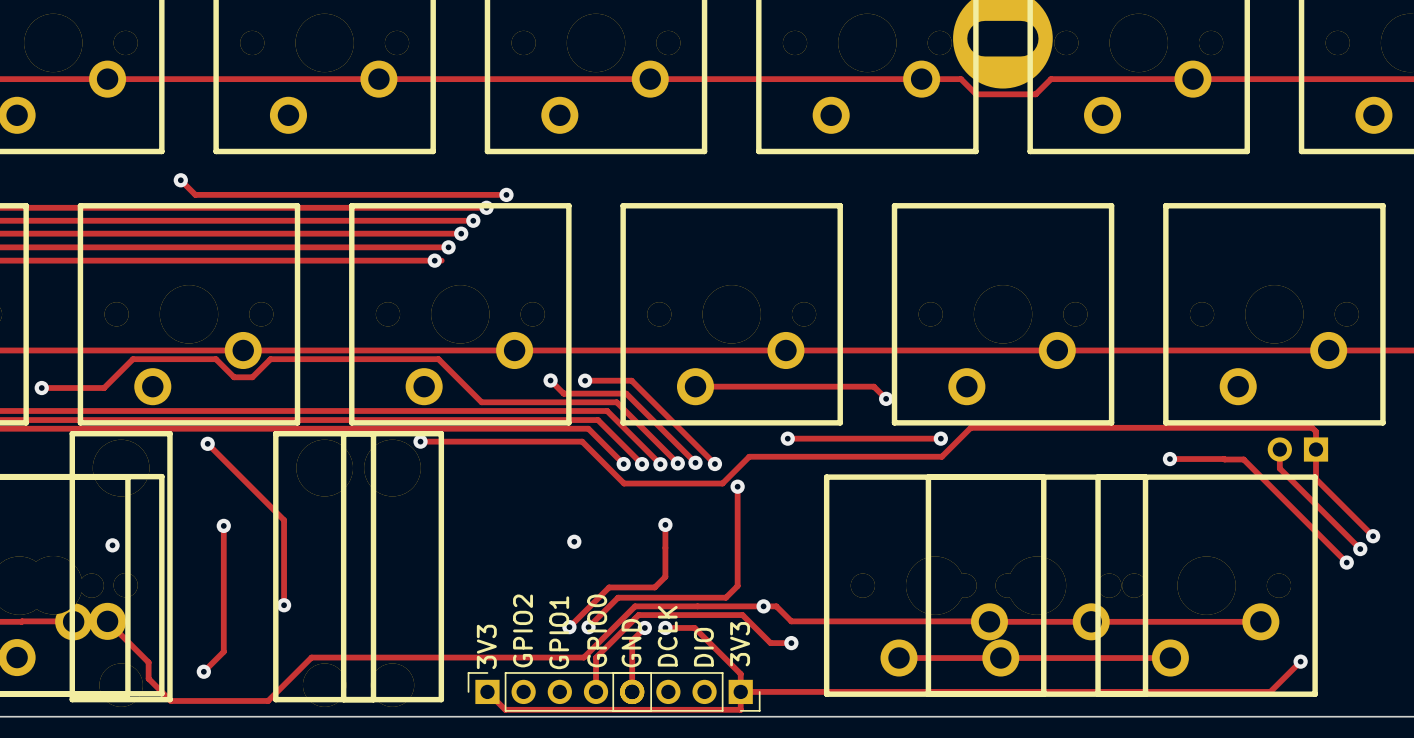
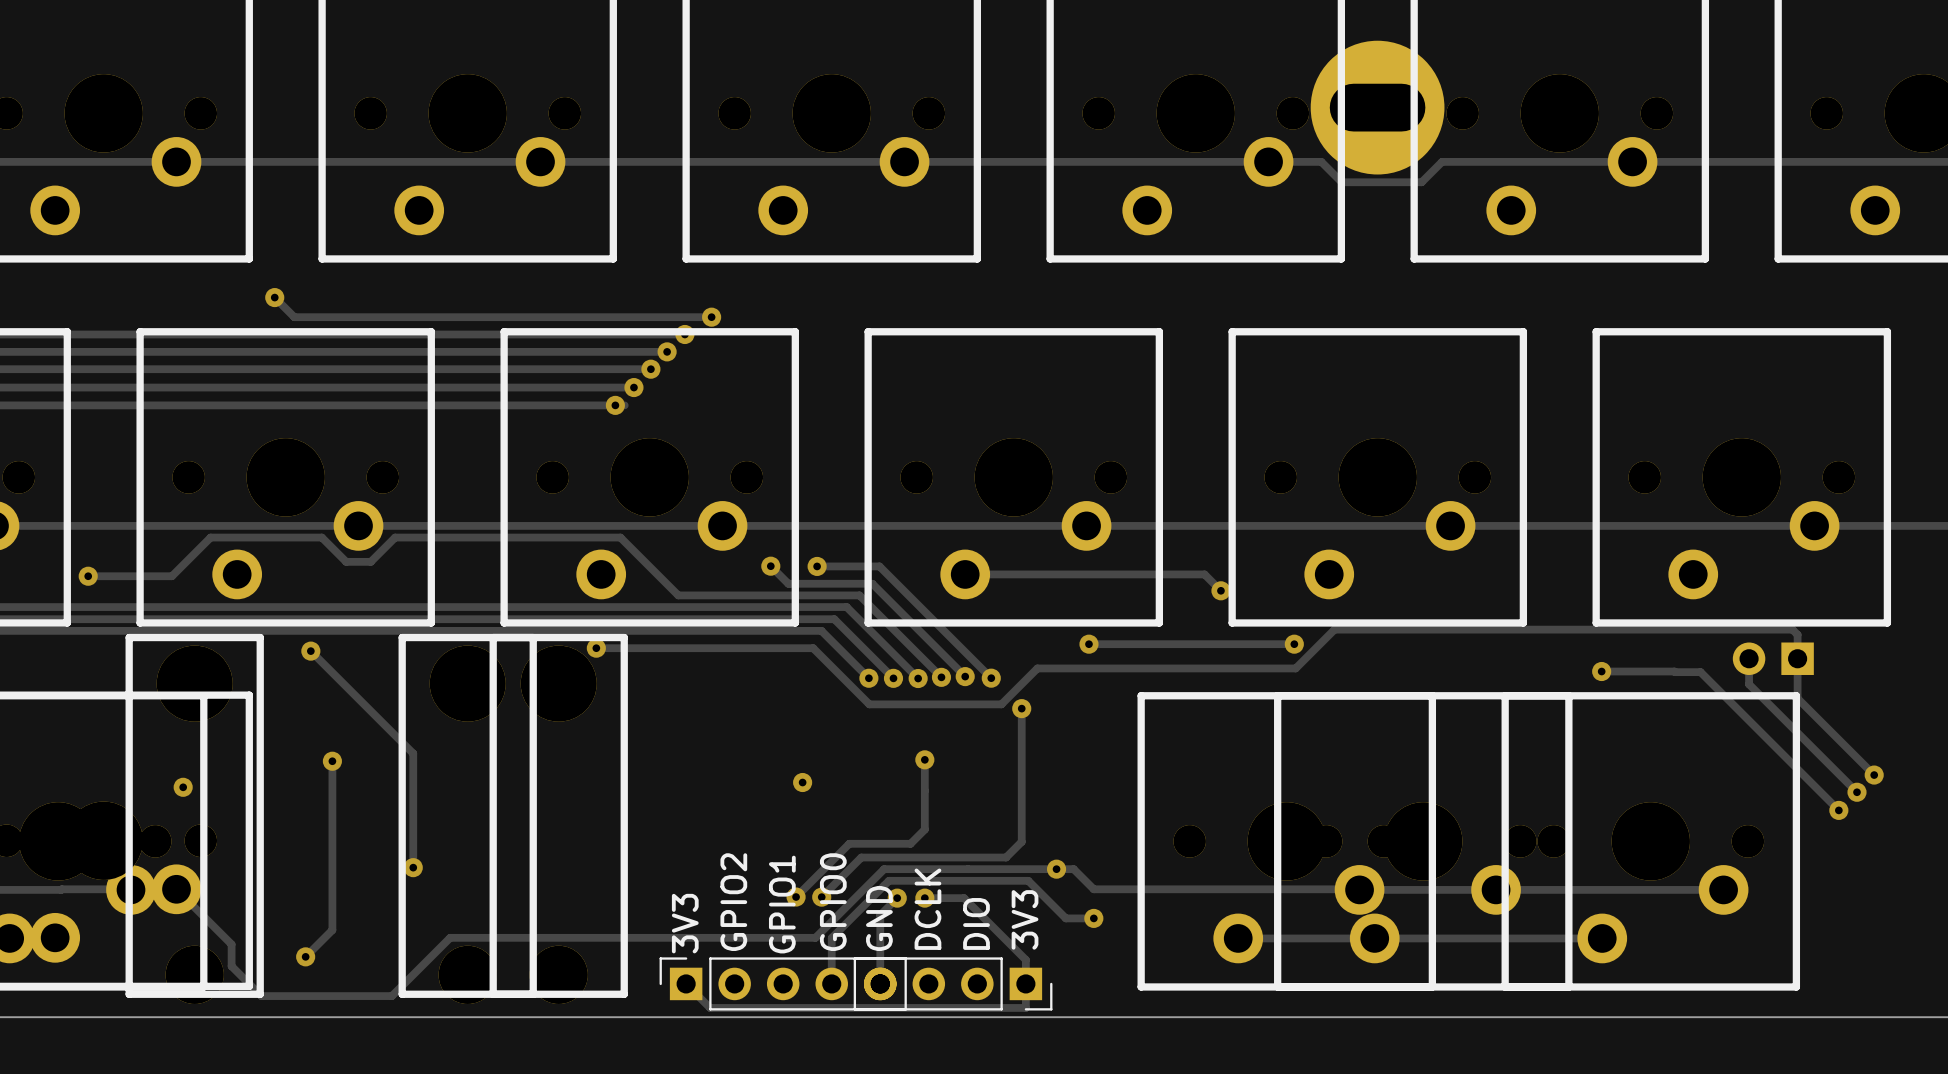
track: (1300, 661) (1270, 691) (740, 691) -> none
via: (1300, 661) -> none

